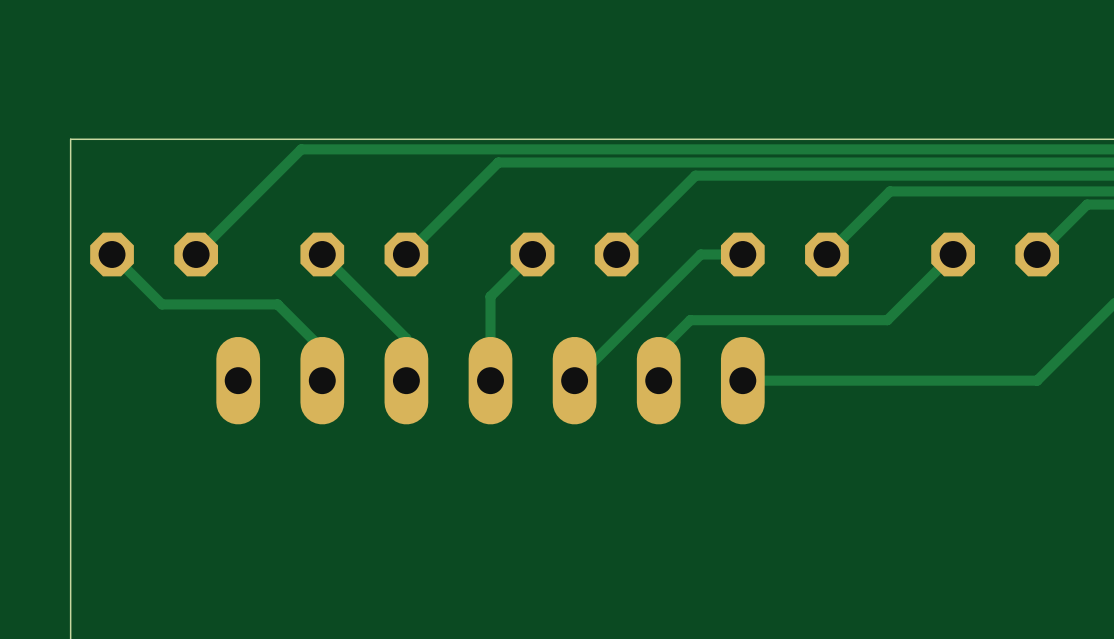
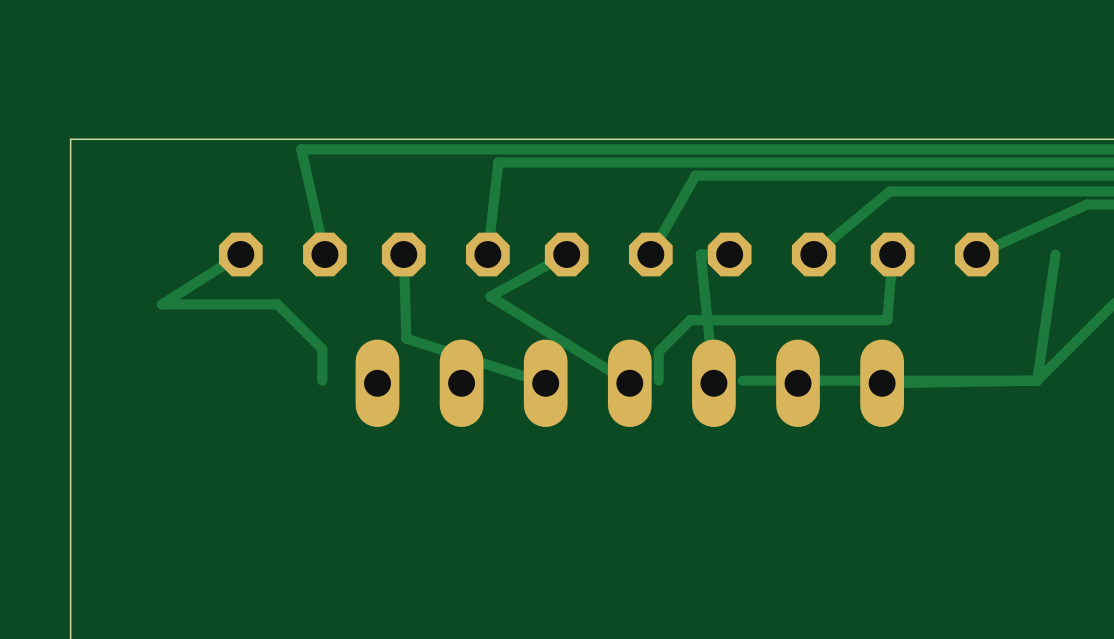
track: (301, 149) (196, 254) -> (301, 149) (324, 254)
track: (498, 162) (406, 254) -> (498, 162) (487, 254)
track: (695, 175) (616, 254) -> (695, 175) (650, 254)
track: (890, 191) (826, 254) -> (890, 191) (813, 254)
track: (1087, 204) (1037, 254) -> (1087, 204) (976, 254)
track: (112, 254) (161, 304) -> (240, 254) (161, 304)
part: (154, 254) -> none
part: none -> (282, 254)
track: (322, 254) (406, 338) (406, 380) -> none
part: (364, 254) -> none
track: none -> (403, 254) (406, 338) (545, 383)
part: none -> (445, 254)
track: (532, 254) (490, 296) (490, 380) -> none
track: none -> (566, 254) (490, 296) (629, 383)
part position: (574, 254) -> (608, 254)
track: (700, 254) (574, 380) -> (700, 254) (713, 383)
part position: (784, 254) -> (771, 254)
track: (953, 254) (887, 320) -> (892, 254) (887, 320)
part position: (995, 254) -> (934, 254)
track: none -> (1055, 254) (1037, 380) (882, 383)
part position: (490, 380) -> (629, 383)

